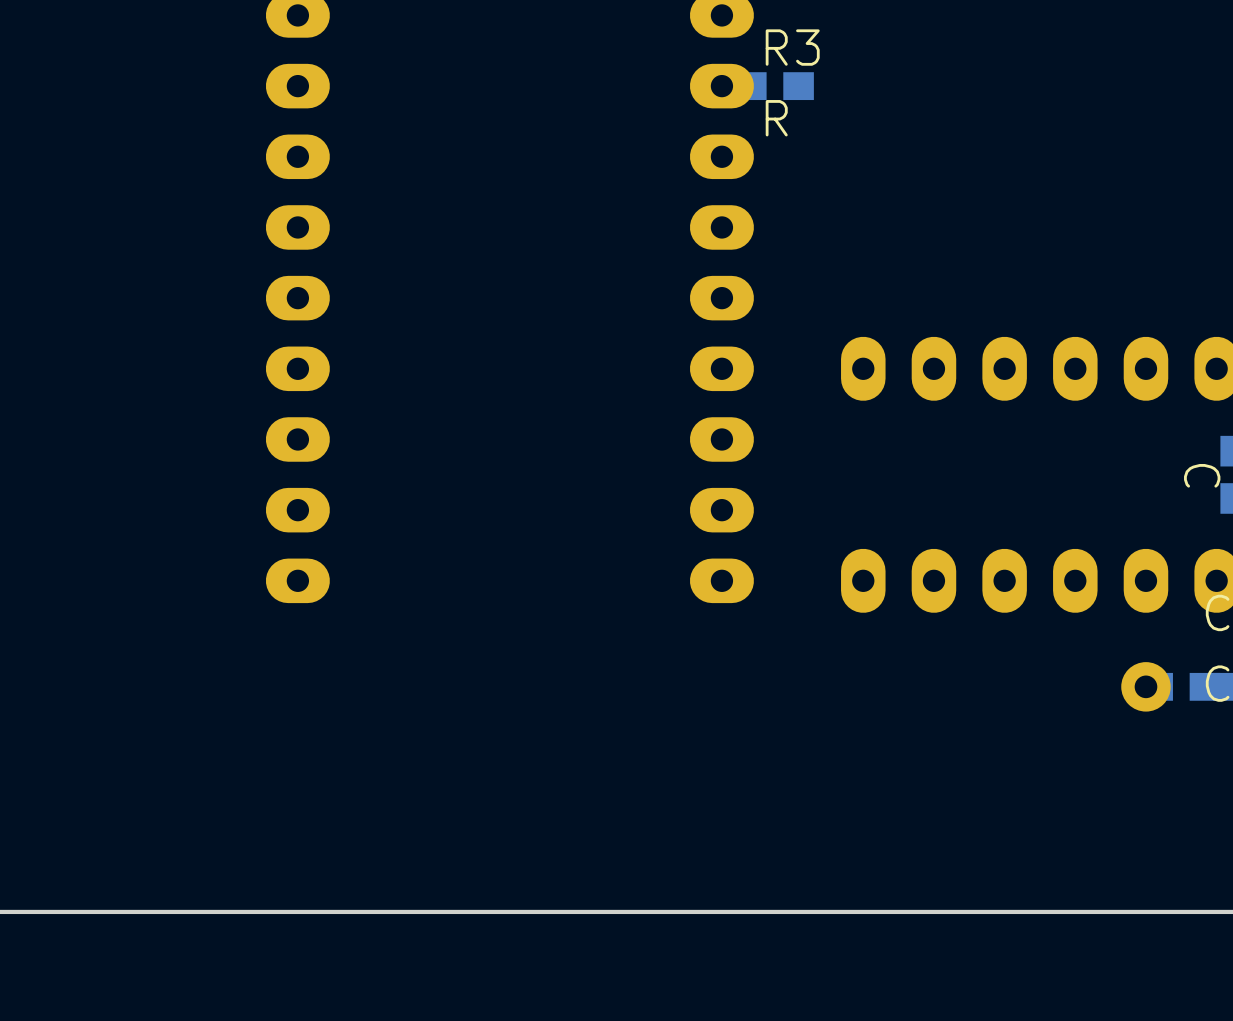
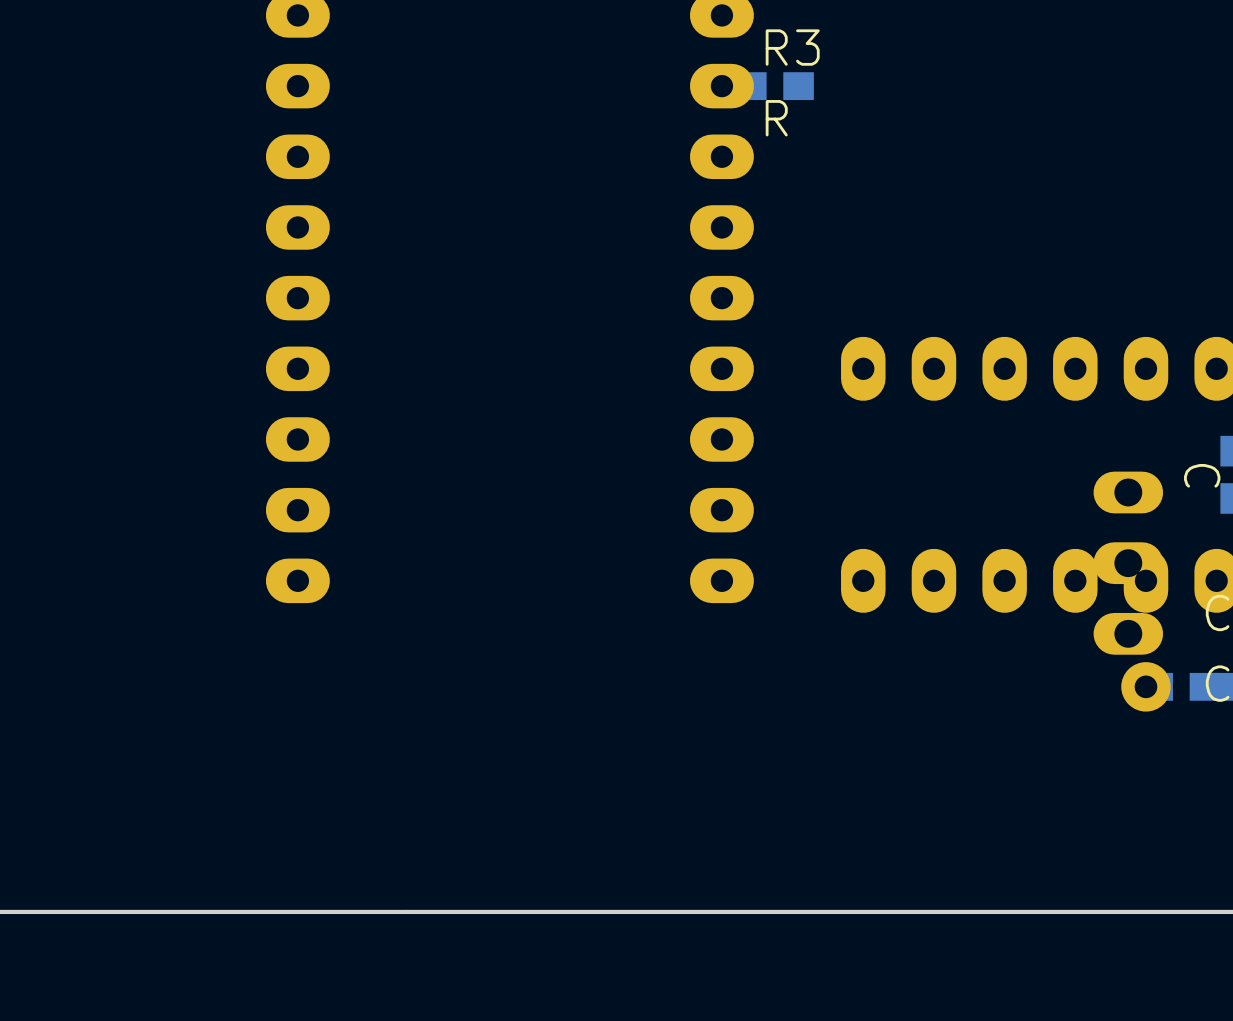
part: none -> (1128, 563)

